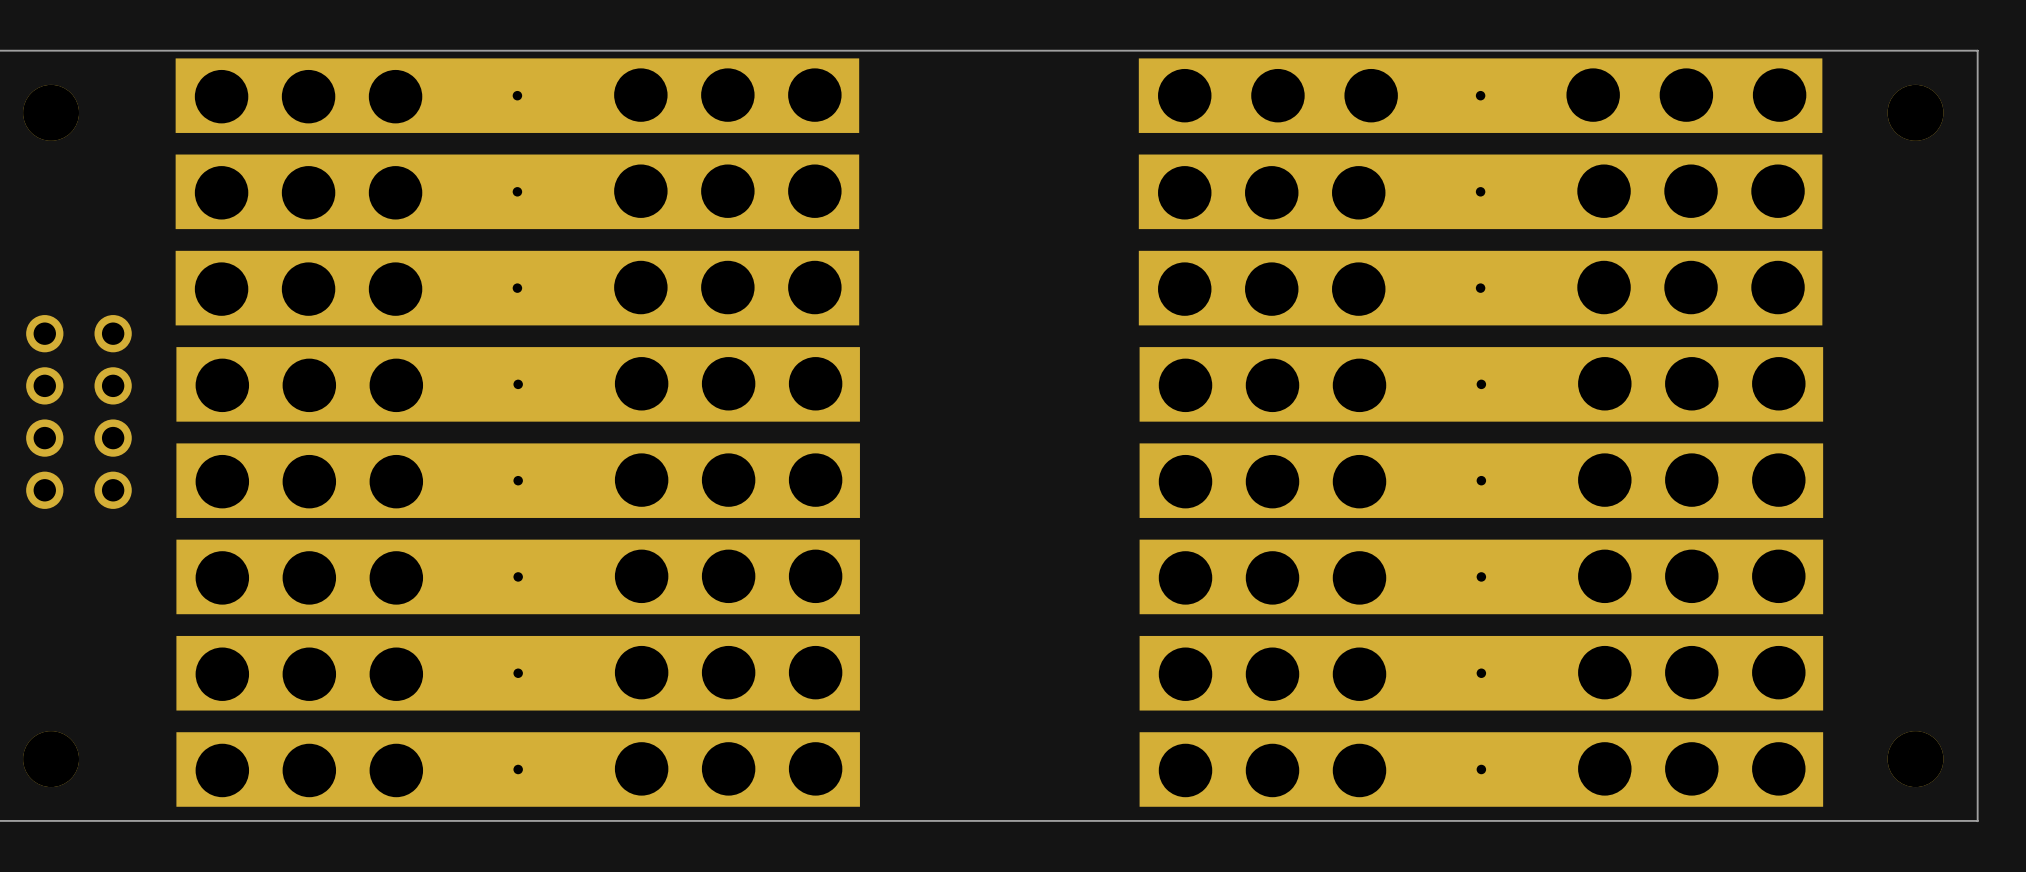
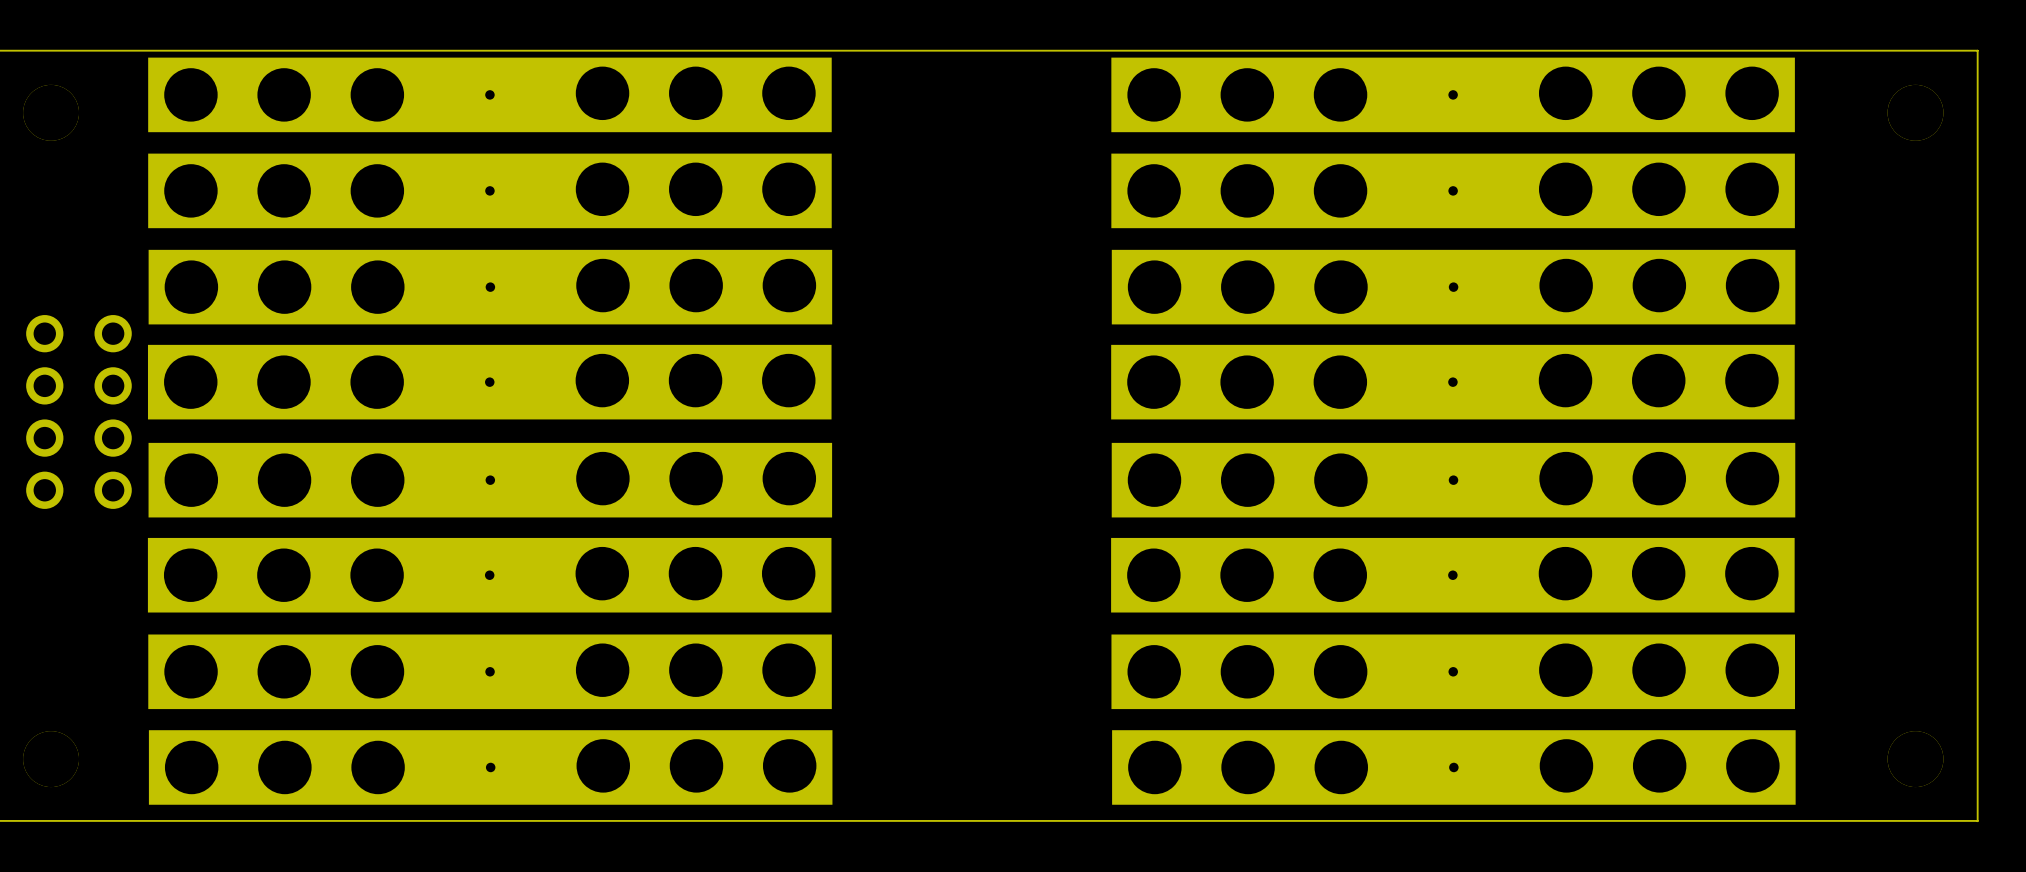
part: none -> (489, 94)
part: none -> (1453, 94)
part: (517, 95) -> none
part: (1480, 95) -> none
part: none -> (489, 190)
part: none -> (1453, 190)
part: (517, 191) -> none
part: (1480, 191) -> none
part: none -> (490, 287)
part: none -> (1453, 287)
part: (517, 288) -> none
part: (1480, 288) -> none
part: none -> (489, 382)
part: none -> (1452, 382)
part: (518, 384) -> none
part: (1481, 384) -> none
part: none -> (490, 480)
part: (518, 480) -> none
part: none -> (1453, 480)
part: (1481, 480) -> none
part: none -> (489, 575)
part: none -> (1452, 575)
part: (518, 576) -> none
part: (1481, 576) -> none
part: none -> (490, 671)
part: none -> (1453, 671)
part: (518, 673) -> none
part: (1481, 673) -> none
part: none -> (490, 767)
part: none -> (1453, 767)
part: (518, 769) -> none
part: (1481, 769) -> none

